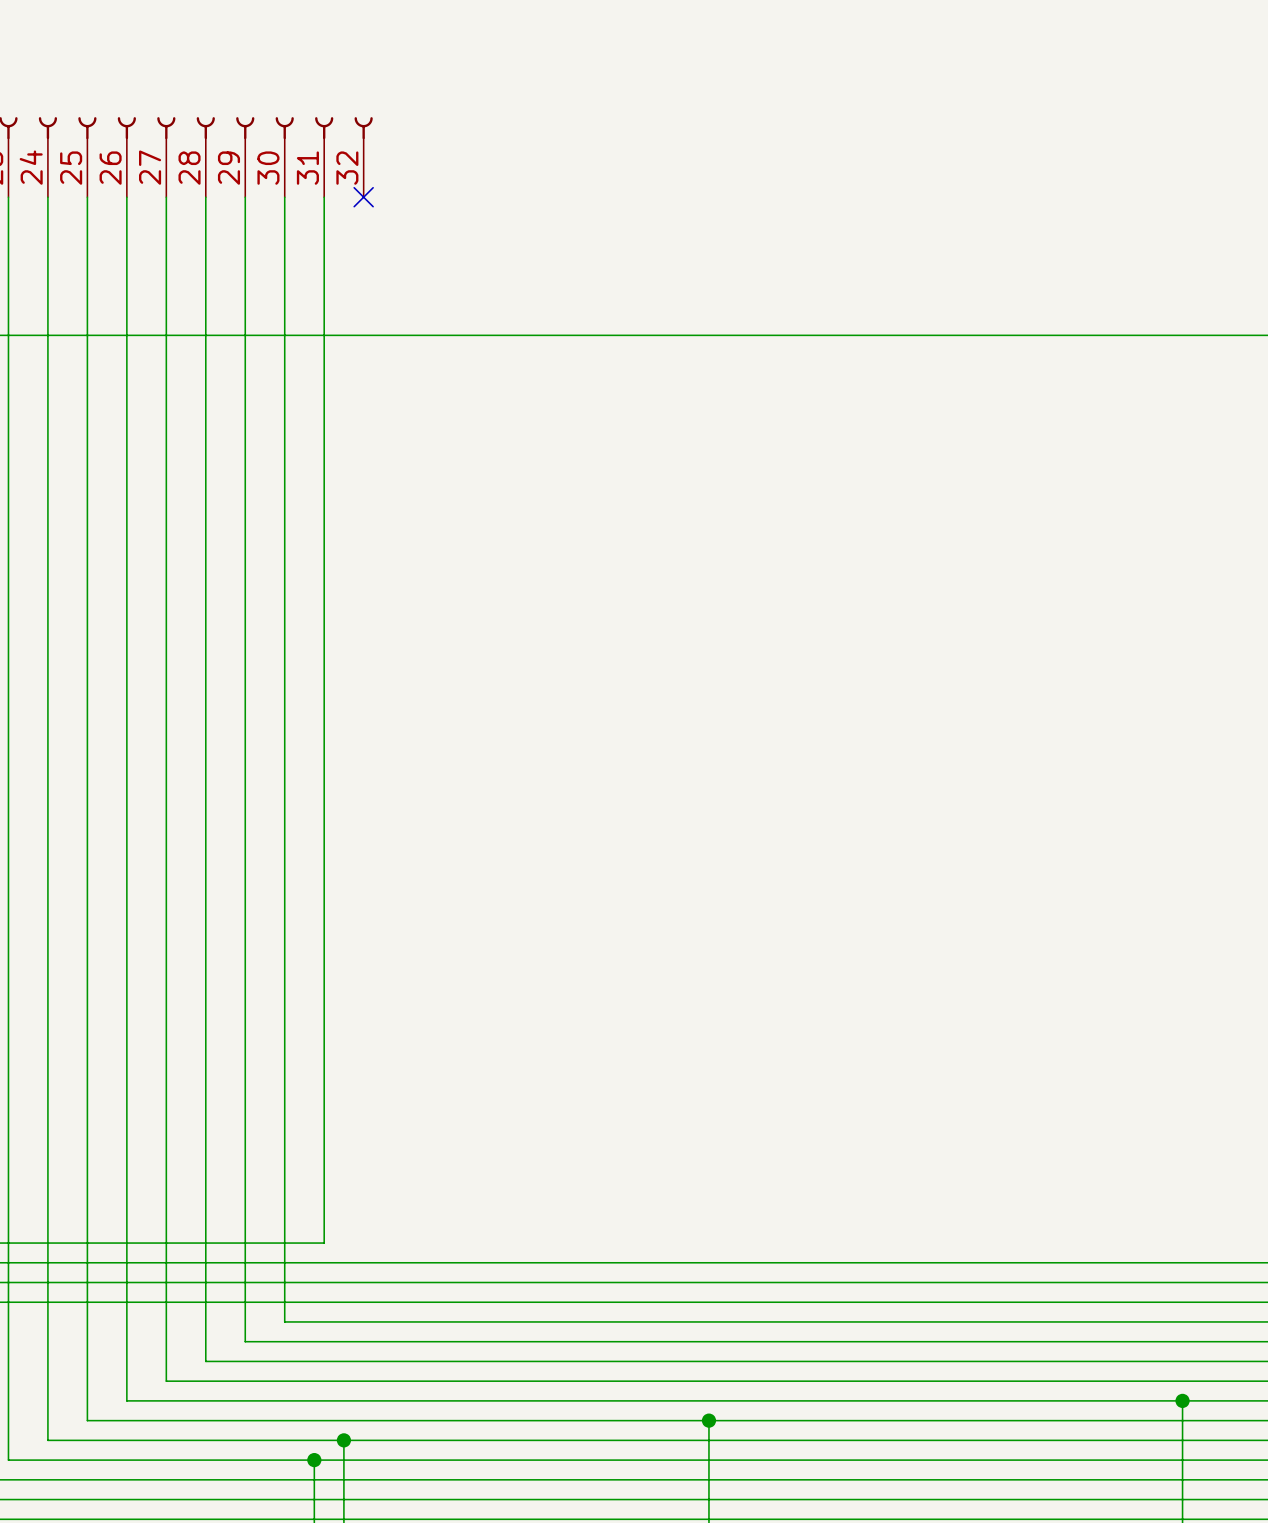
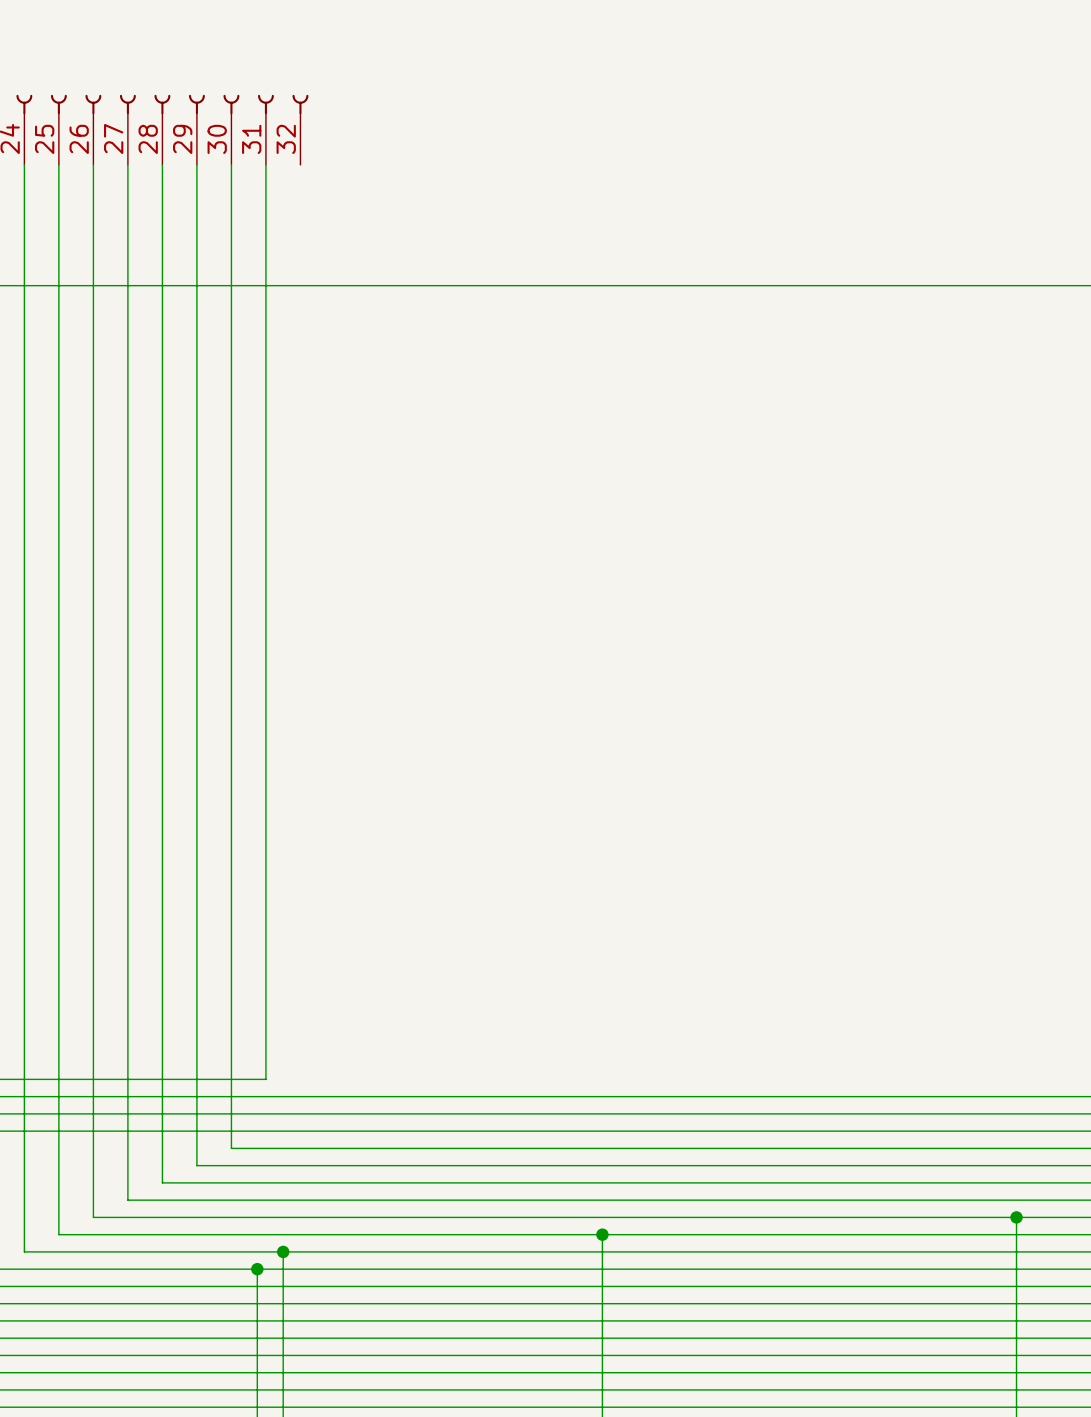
no-connect mark: (363, 197) -> none

